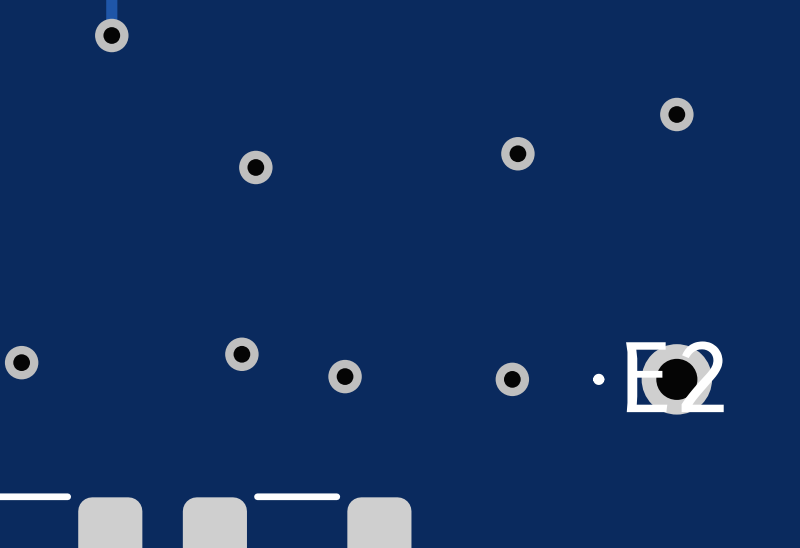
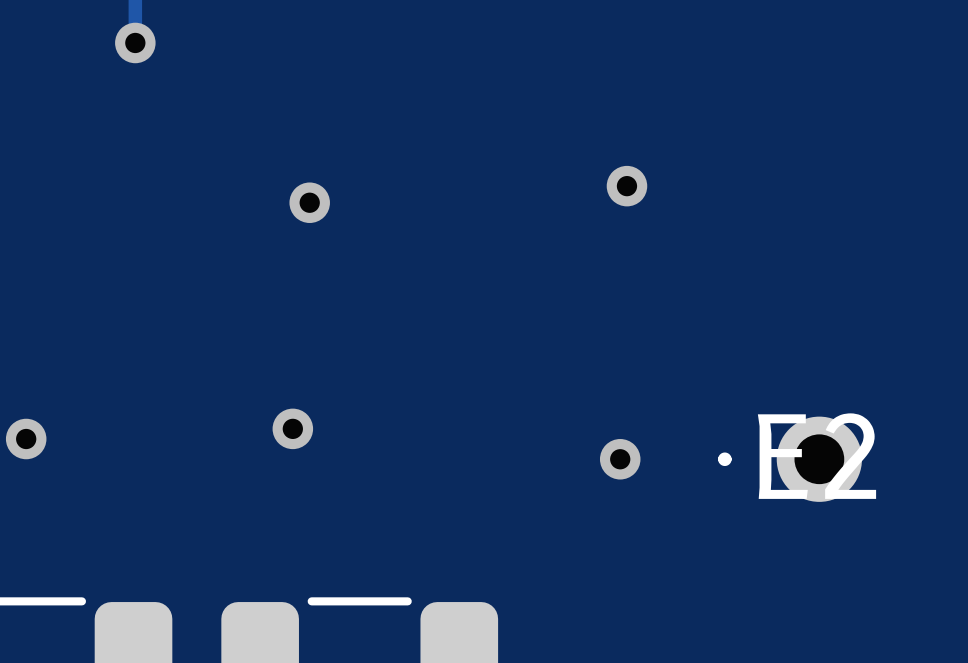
via: (676, 114) -> none
via: (345, 376) -> none

